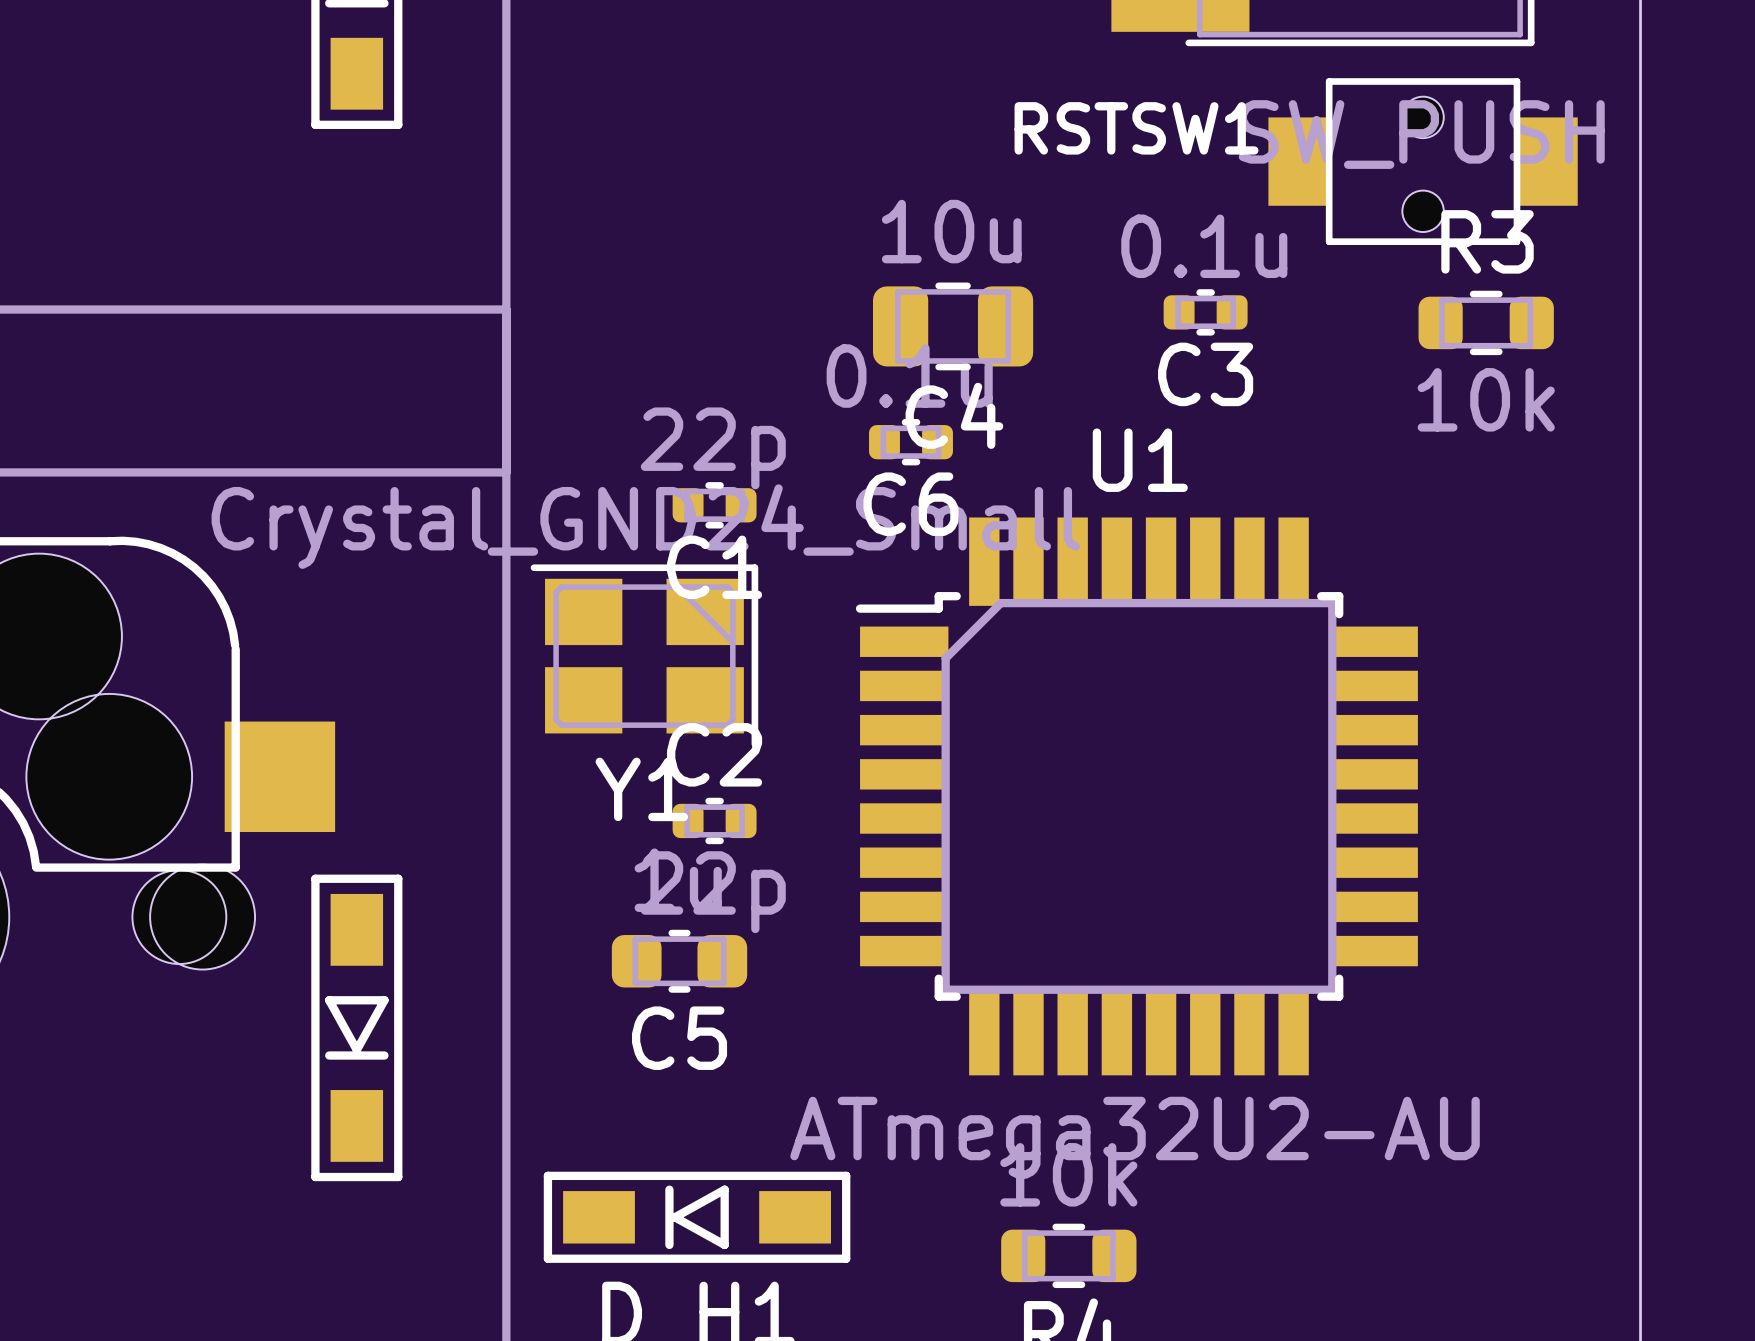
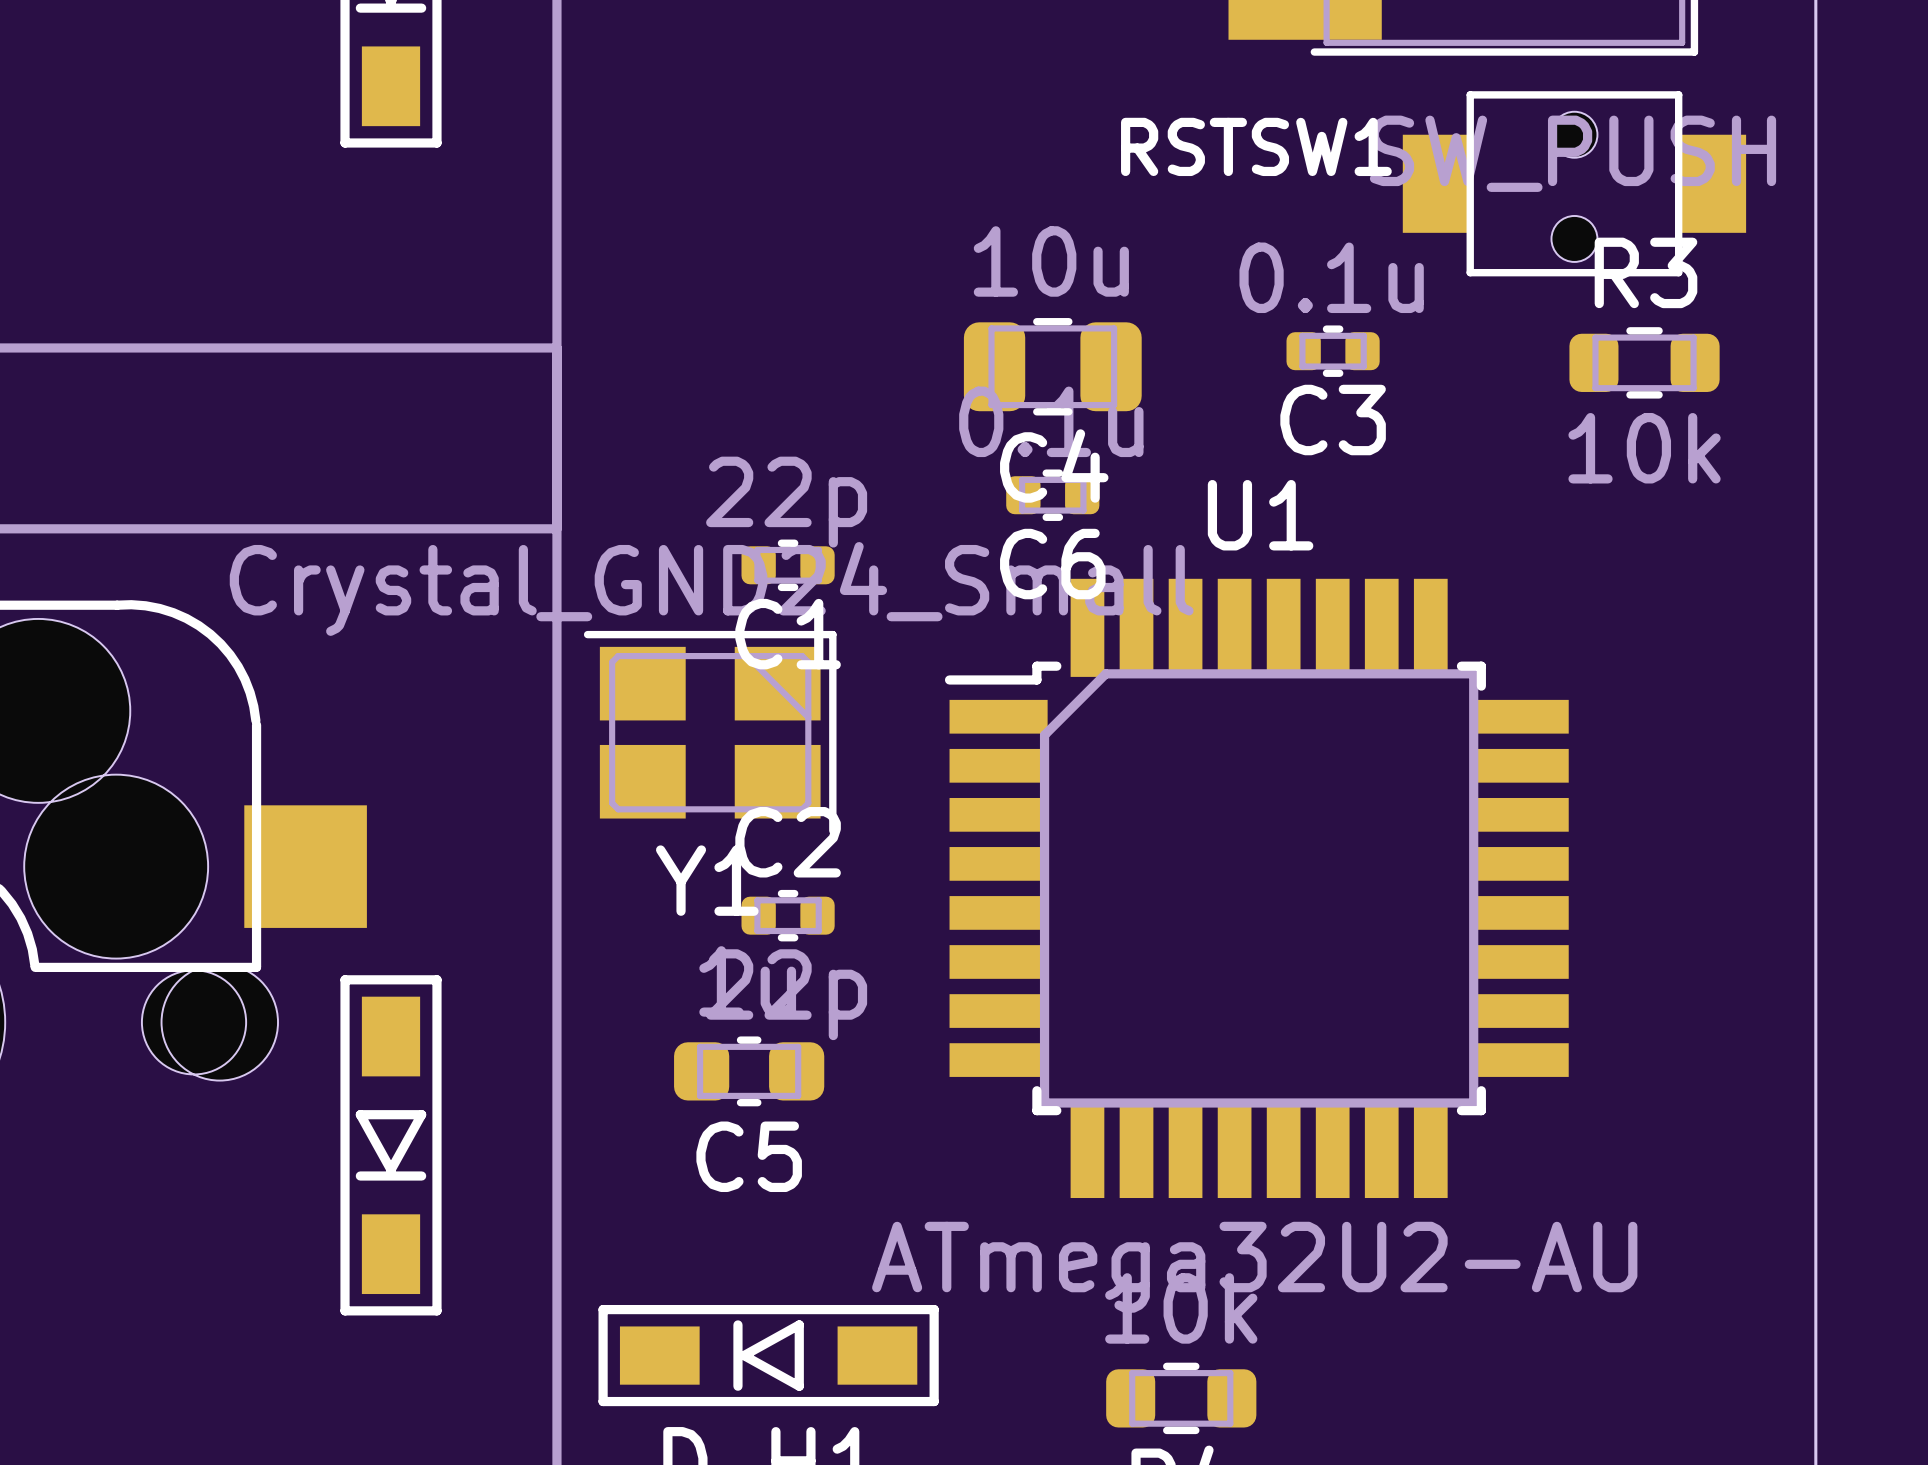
C6 position: (911, 442) -> (1052, 495)

